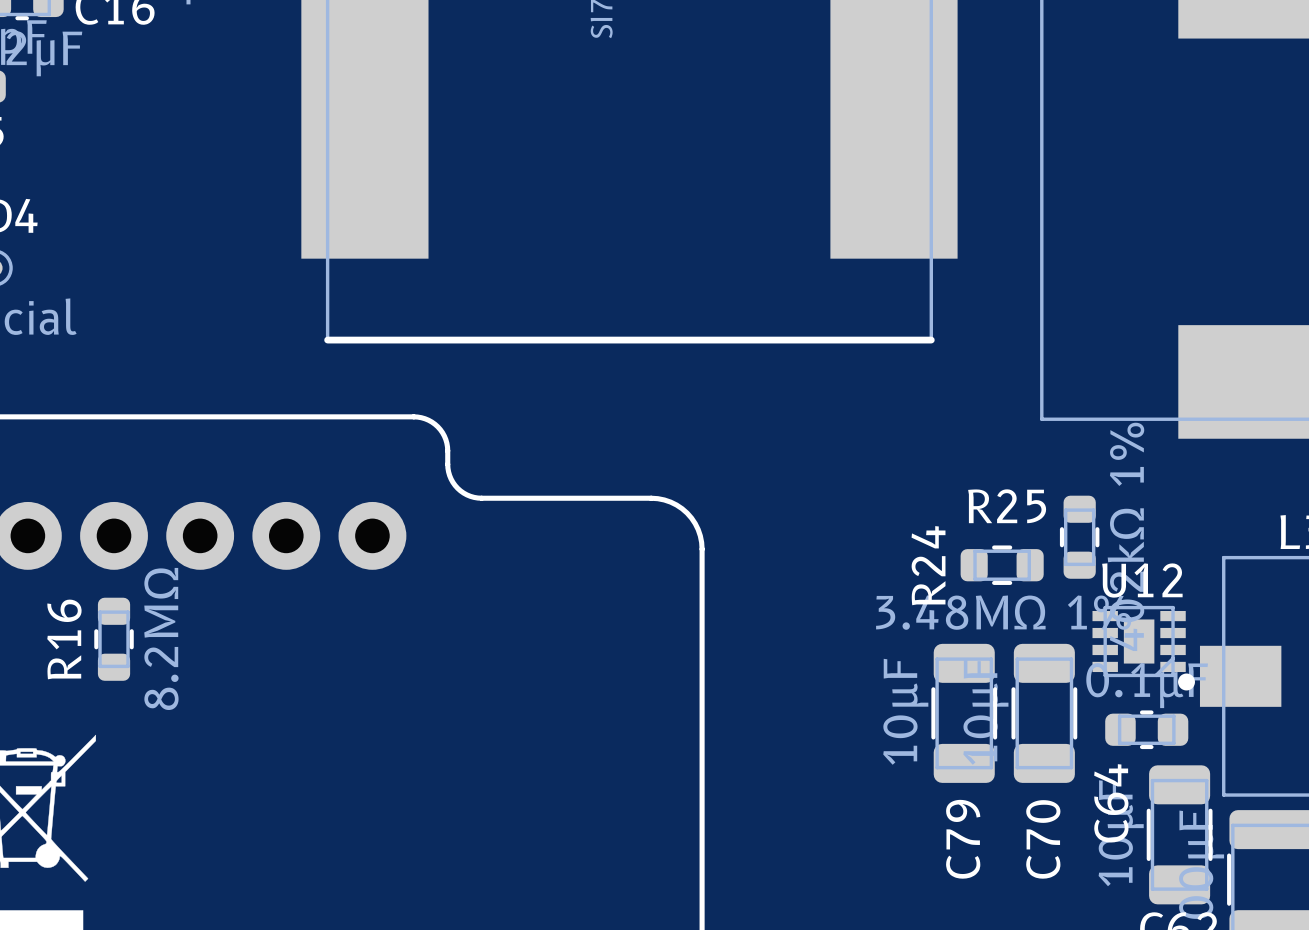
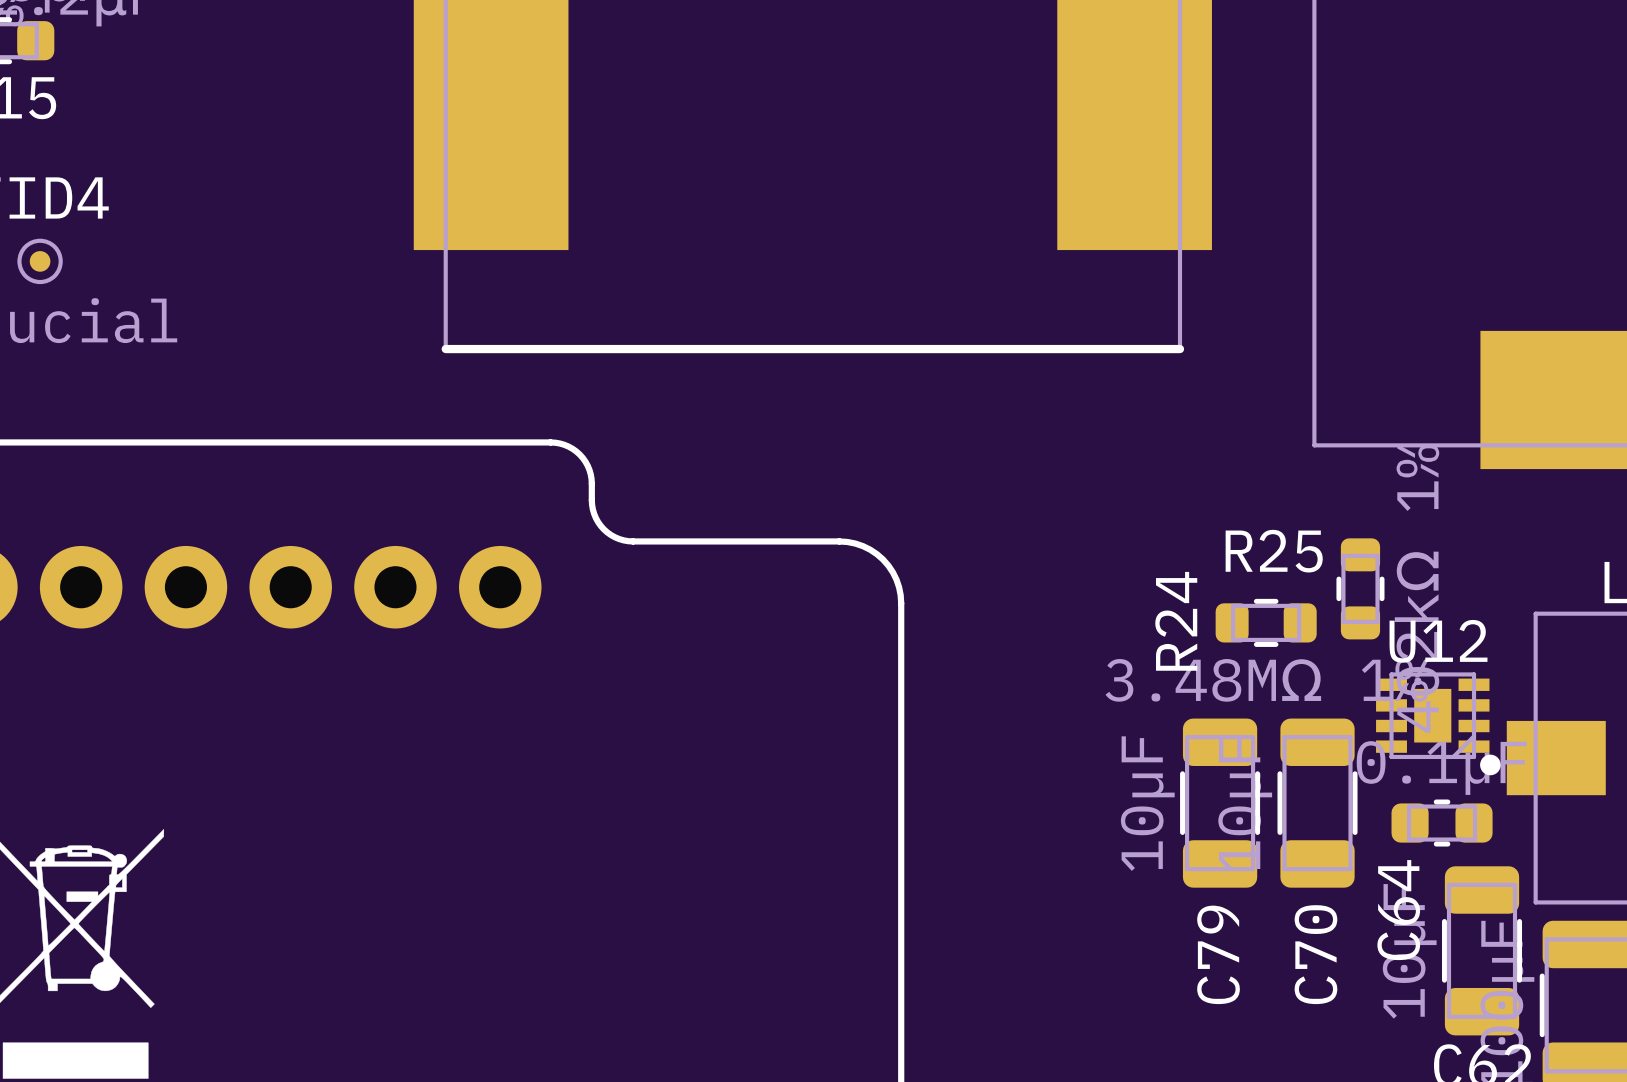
R16: 8.2MΩ (114, 639) -> none

